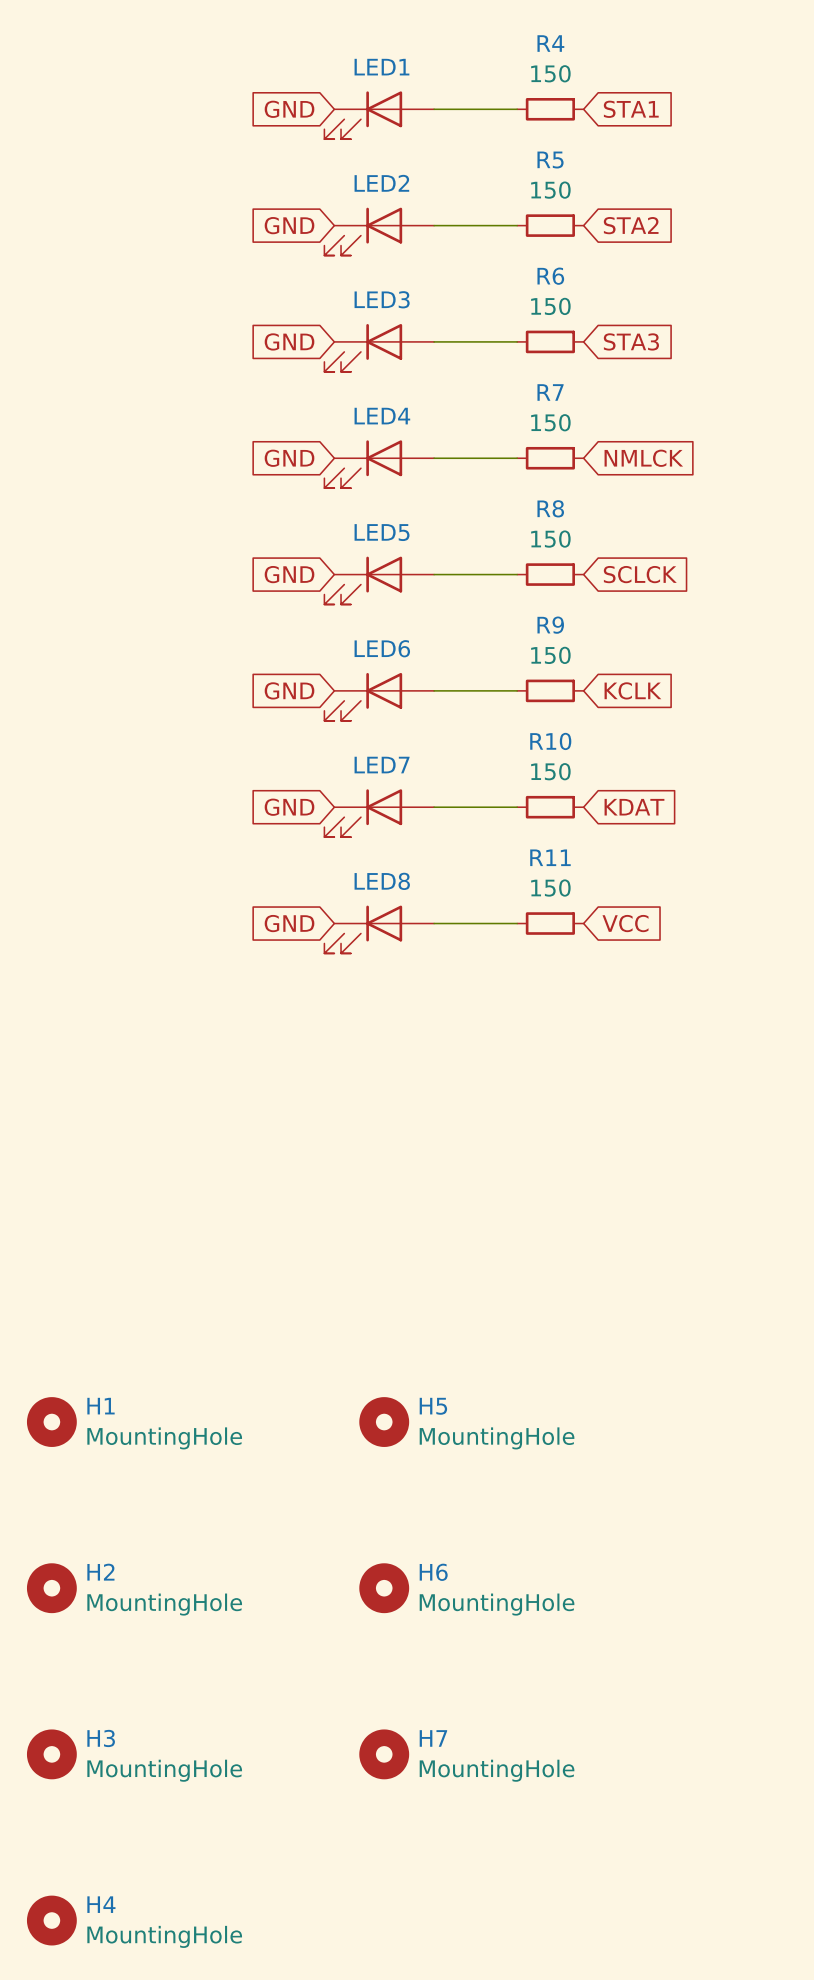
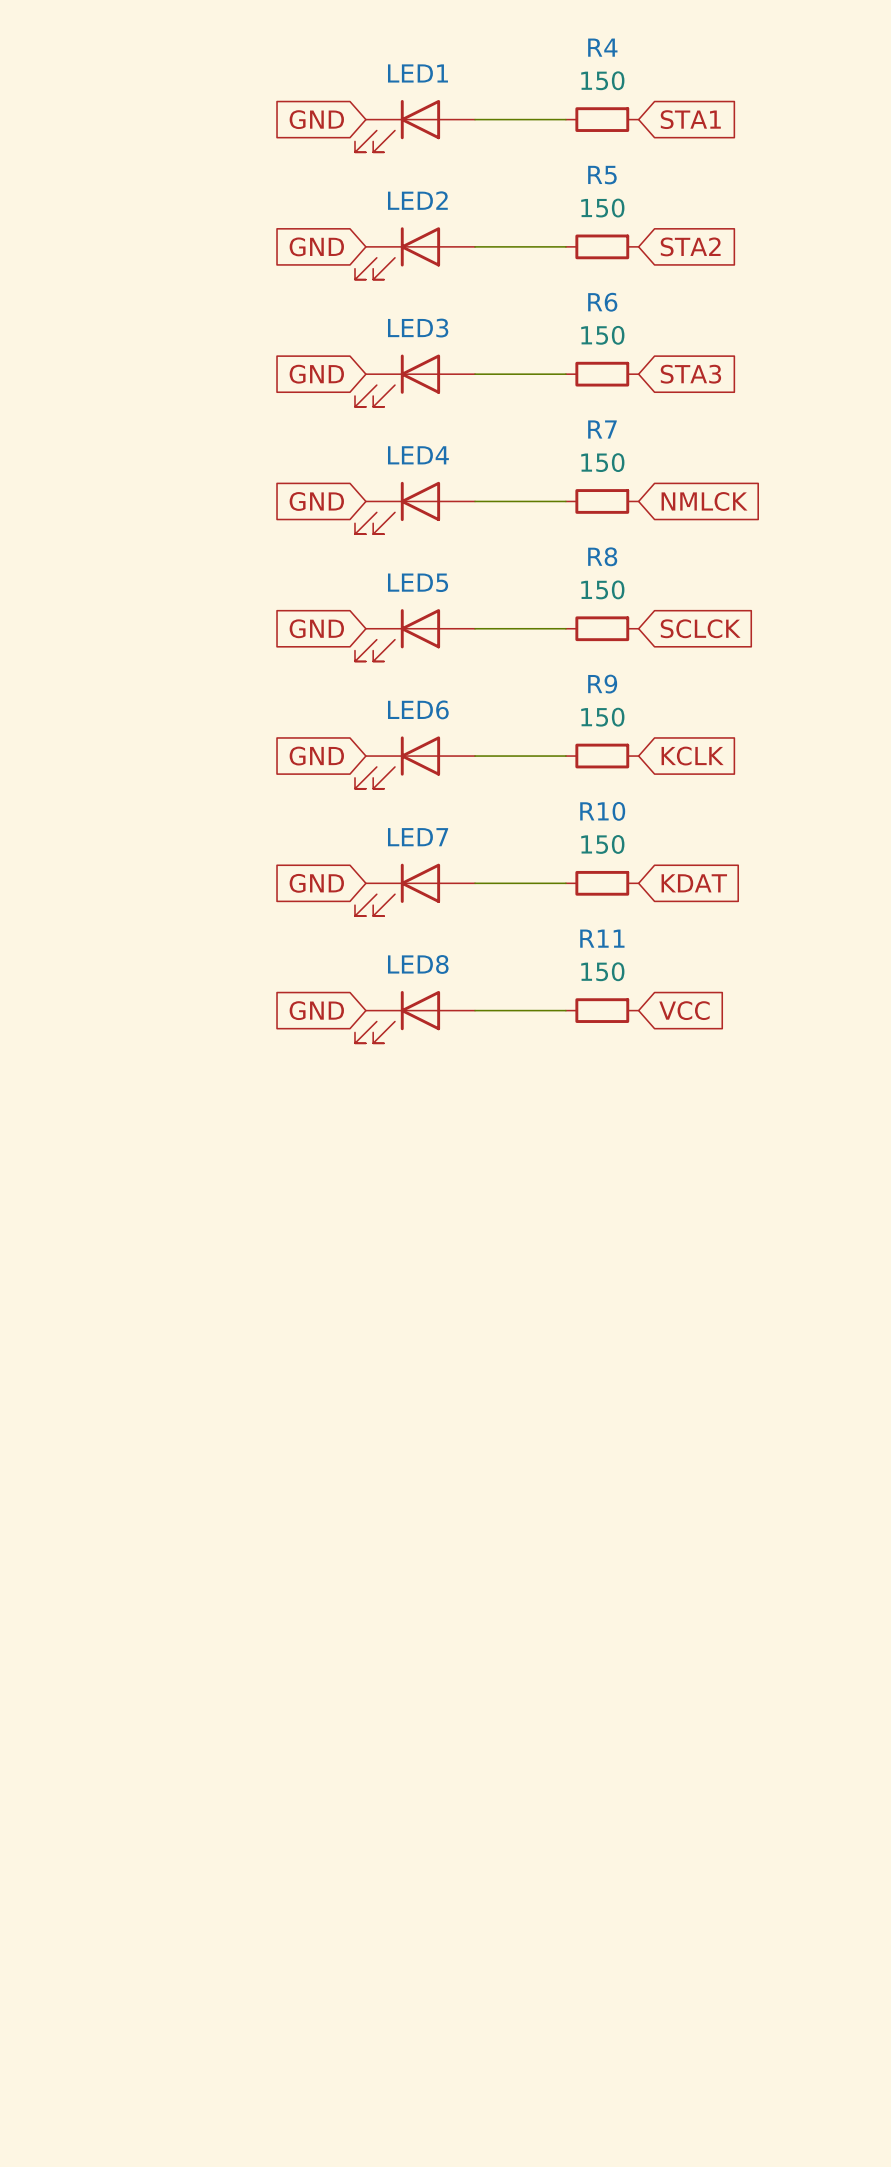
H1: MountingHole (51, 1422) -> none
H5: MountingHole (384, 1422) -> none
H2: MountingHole (51, 1588) -> none
H6: MountingHole (384, 1588) -> none
H3: MountingHole (51, 1754) -> none
H7: MountingHole (384, 1754) -> none
H4: MountingHole (51, 1920) -> none

